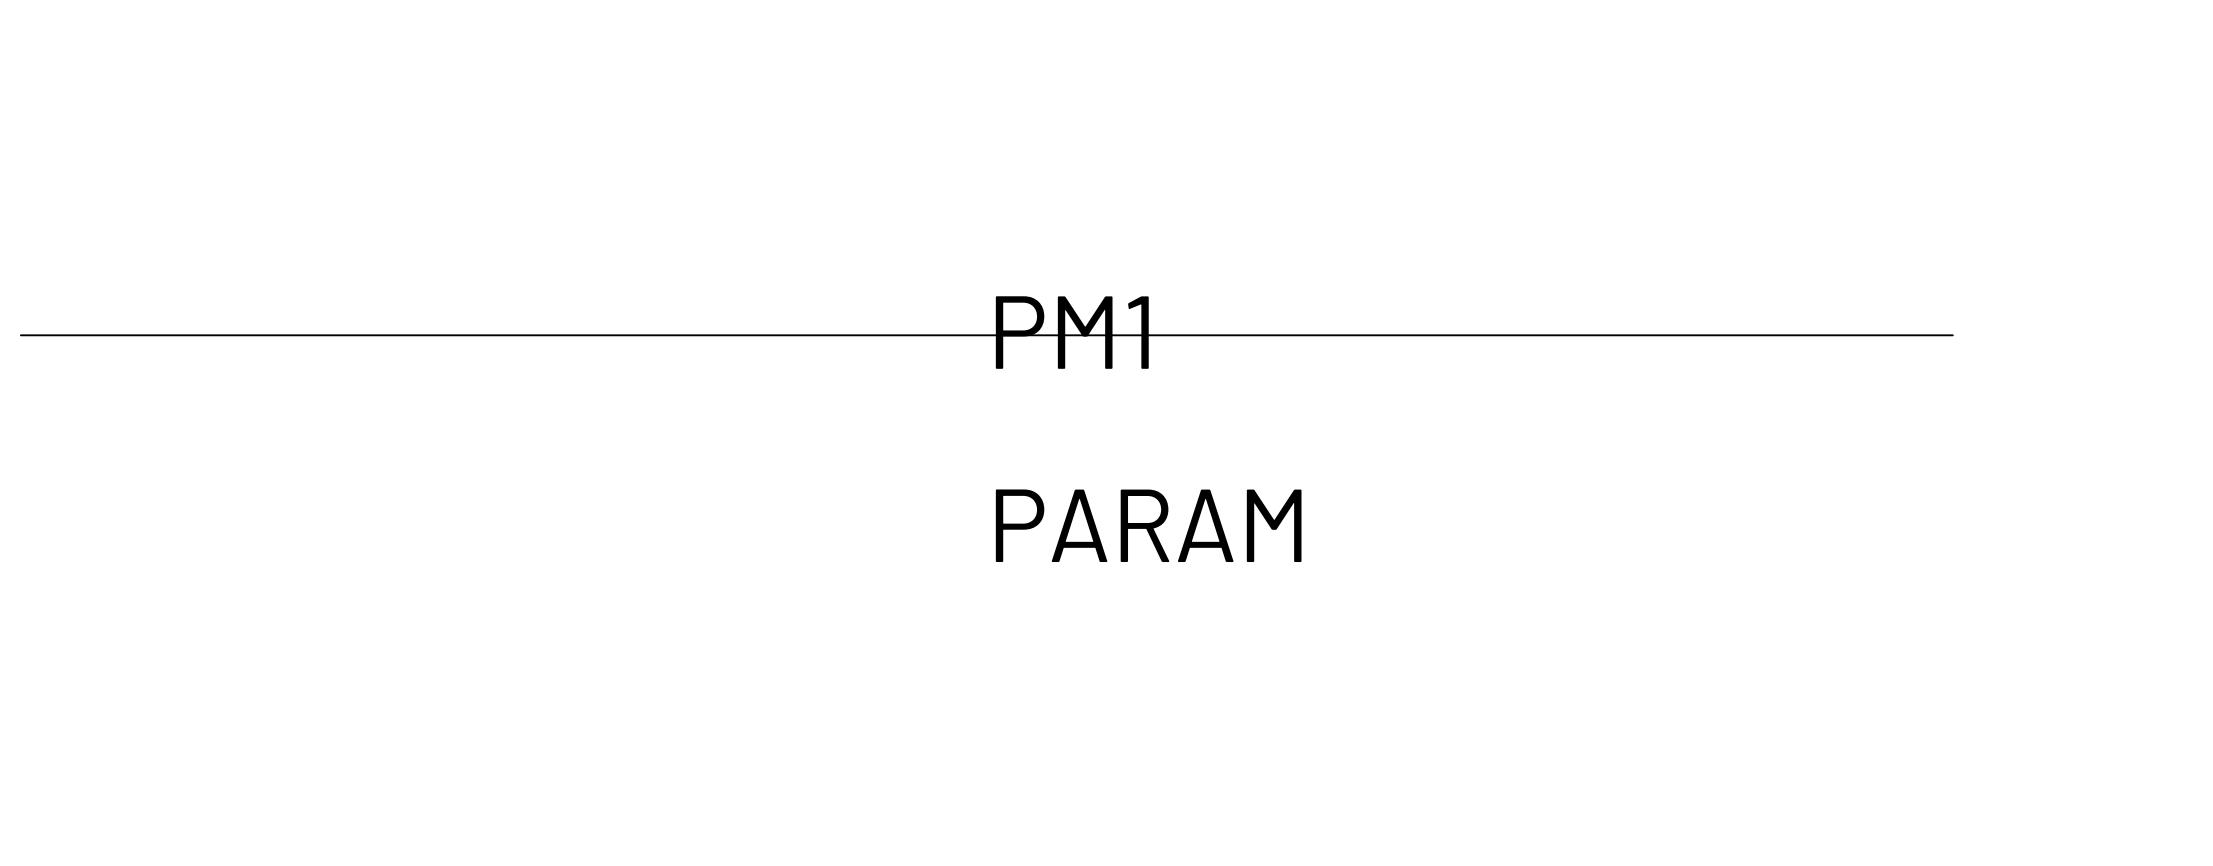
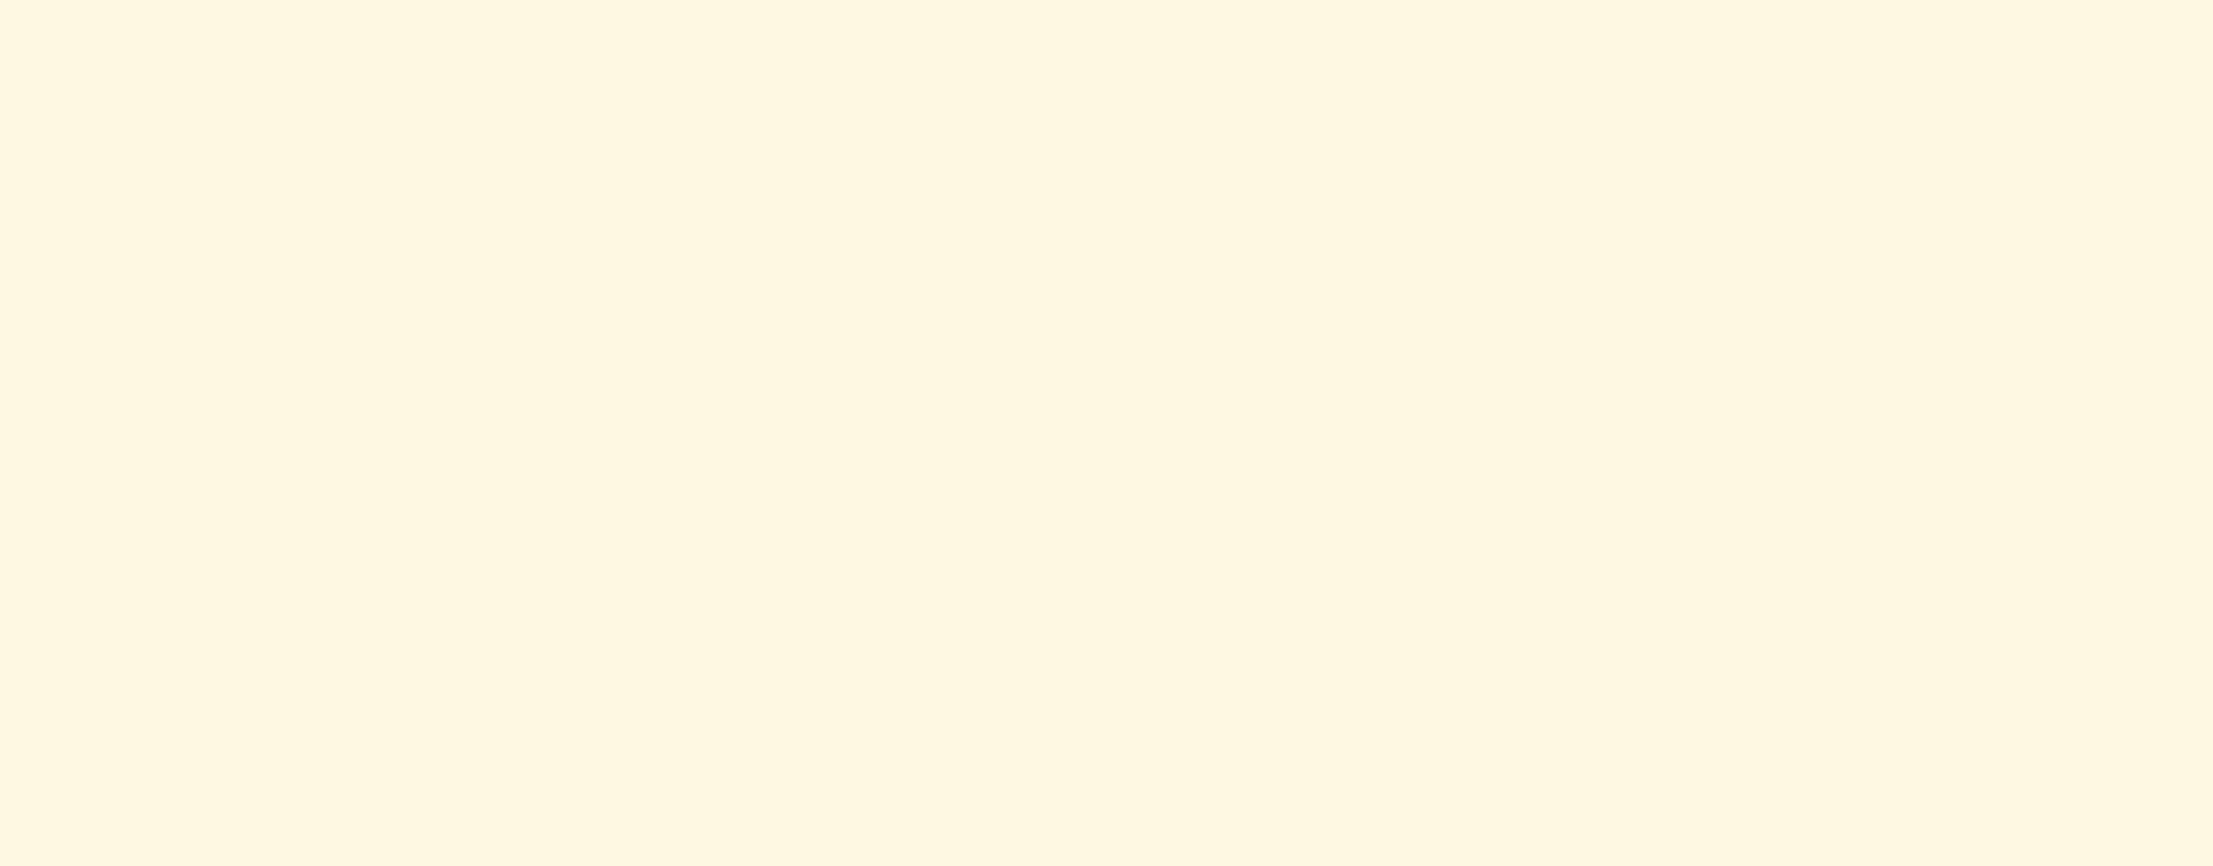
PM1: PARAM (986, 335) -> none

